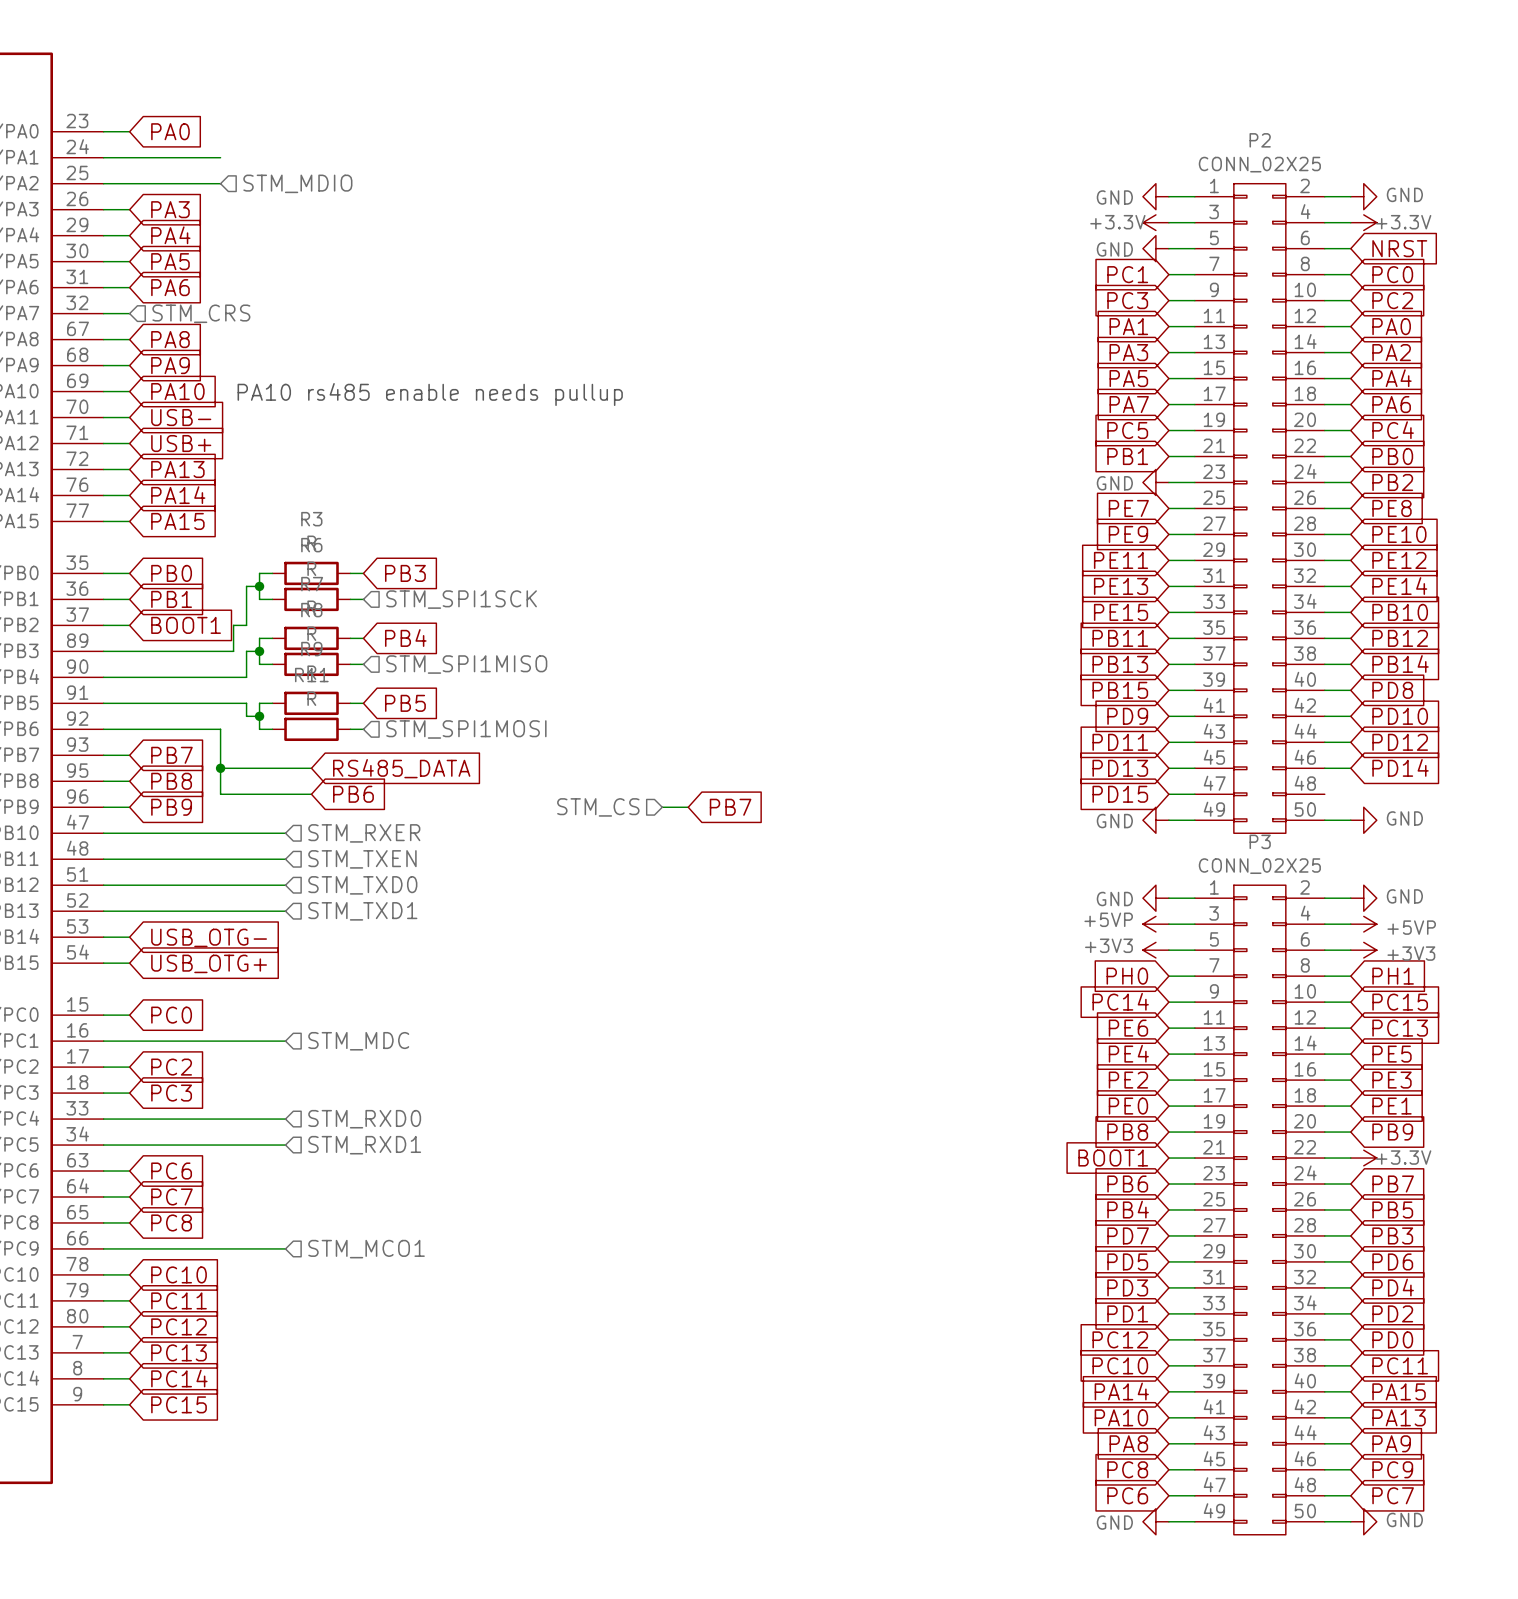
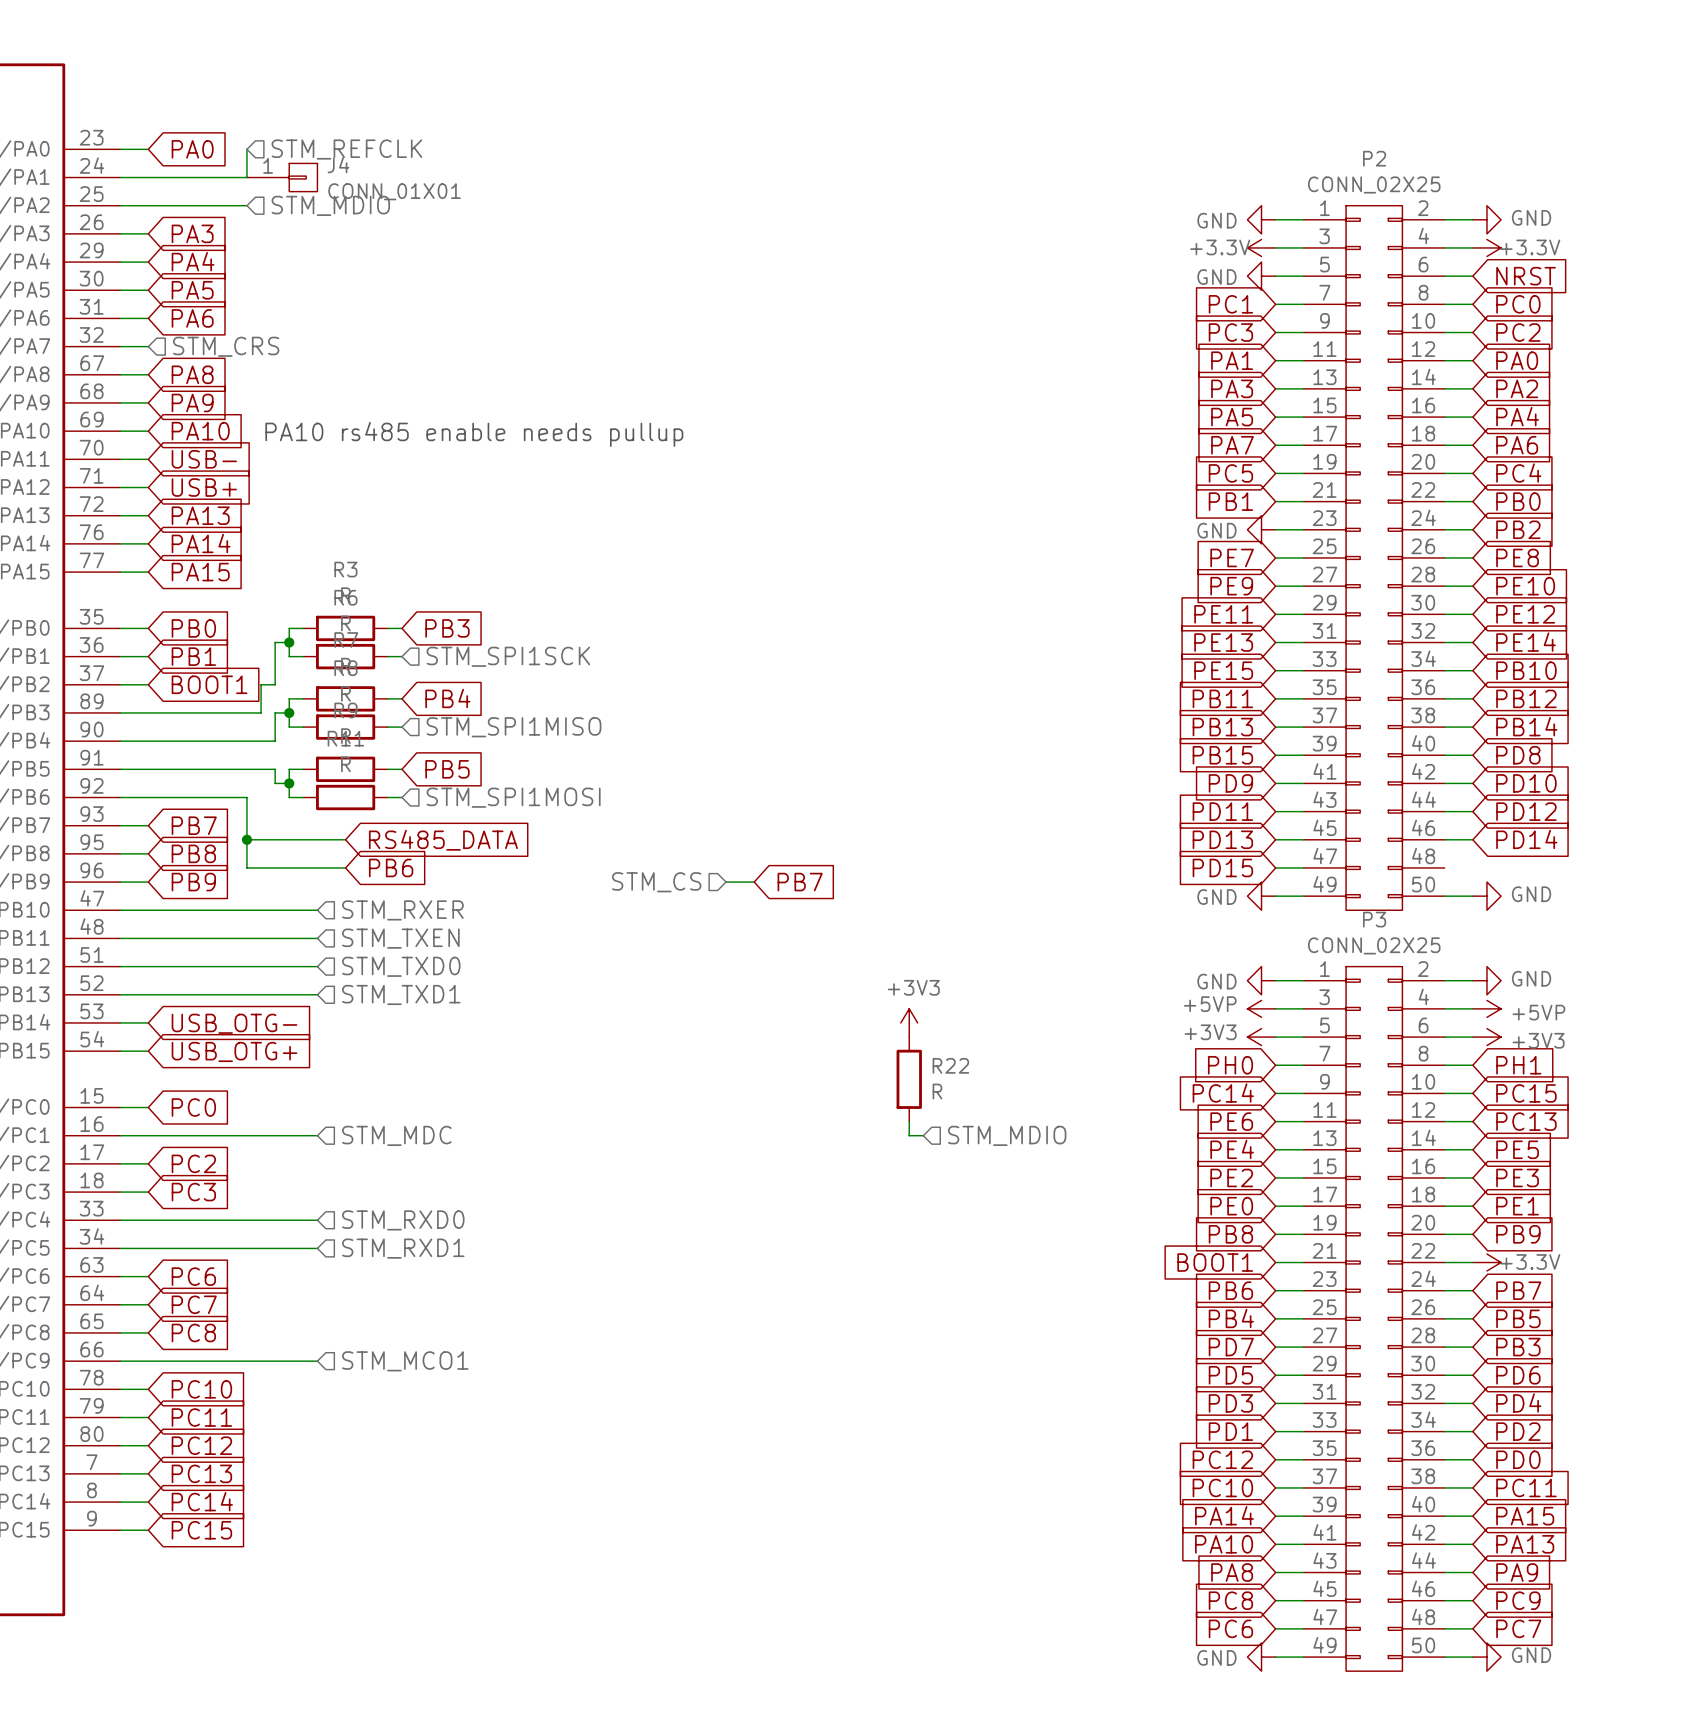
wire: none -> (246, 149) (246, 177)
hierarchical label: none -> STM_REFCLK (346, 149)
J4: none -> CONN_01X01 (282, 177)
power symbol: none -> +3V3 (909, 1022)
R22: none -> R (909, 1079)
wire: none -> (909, 1121) (909, 1135) (923, 1135)
hierarchical label: none -> STM_MDIO (1007, 1135)

